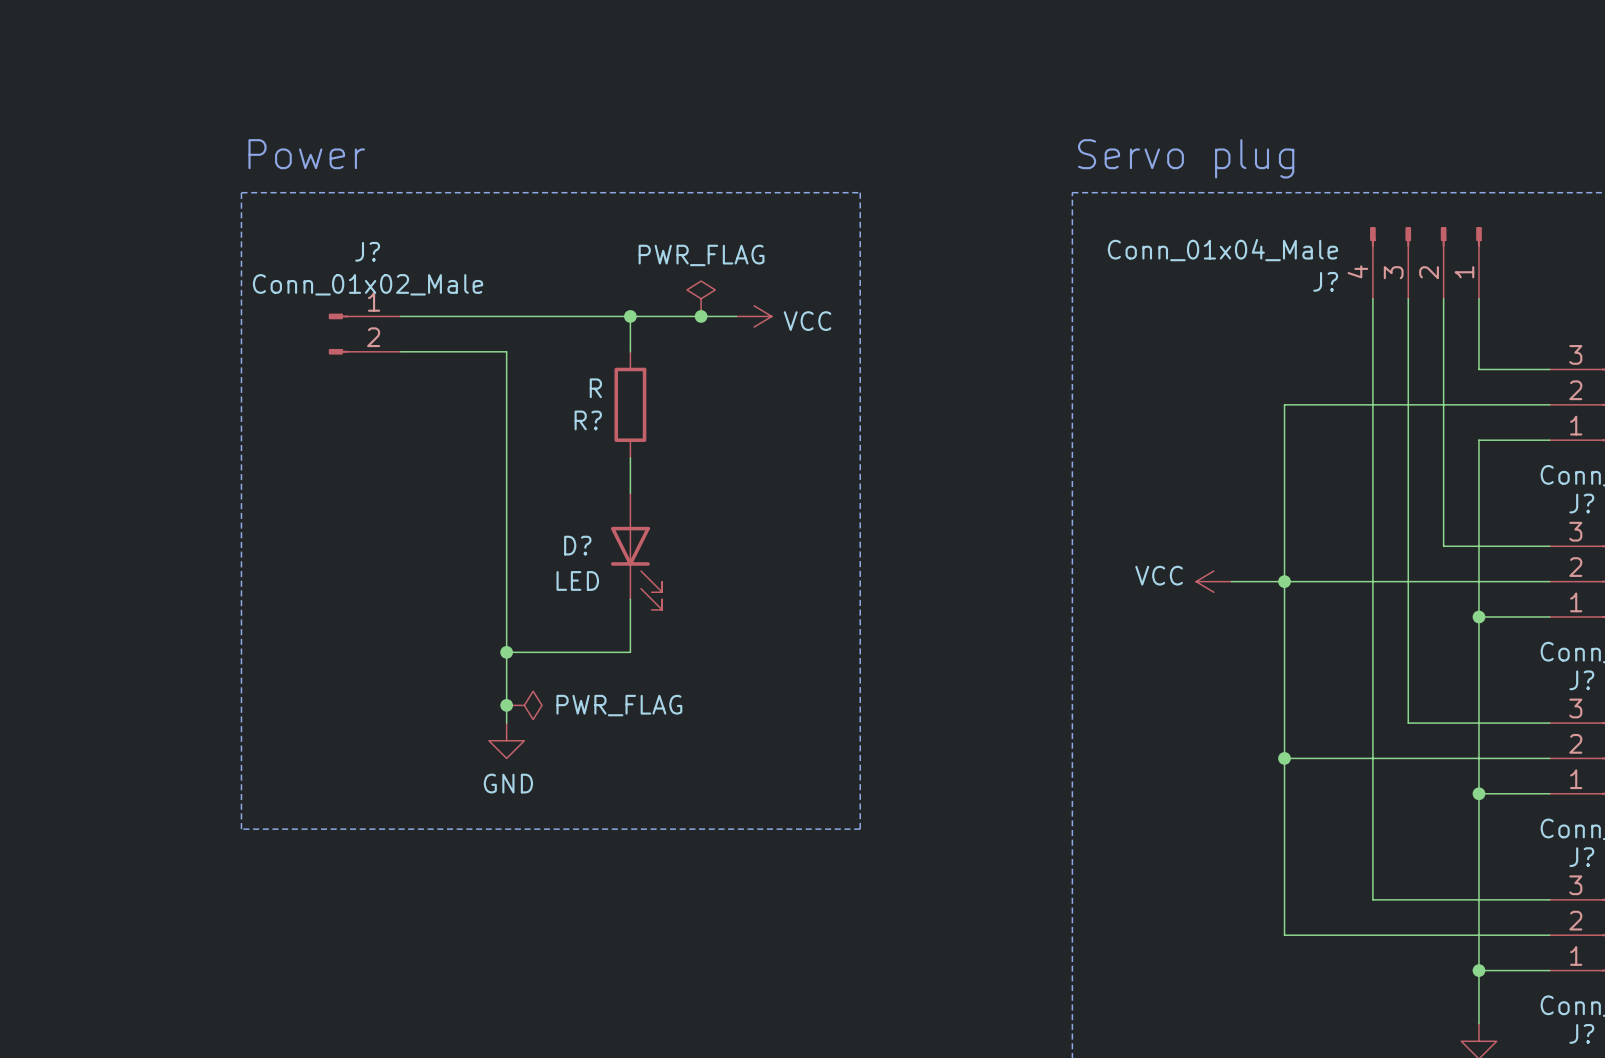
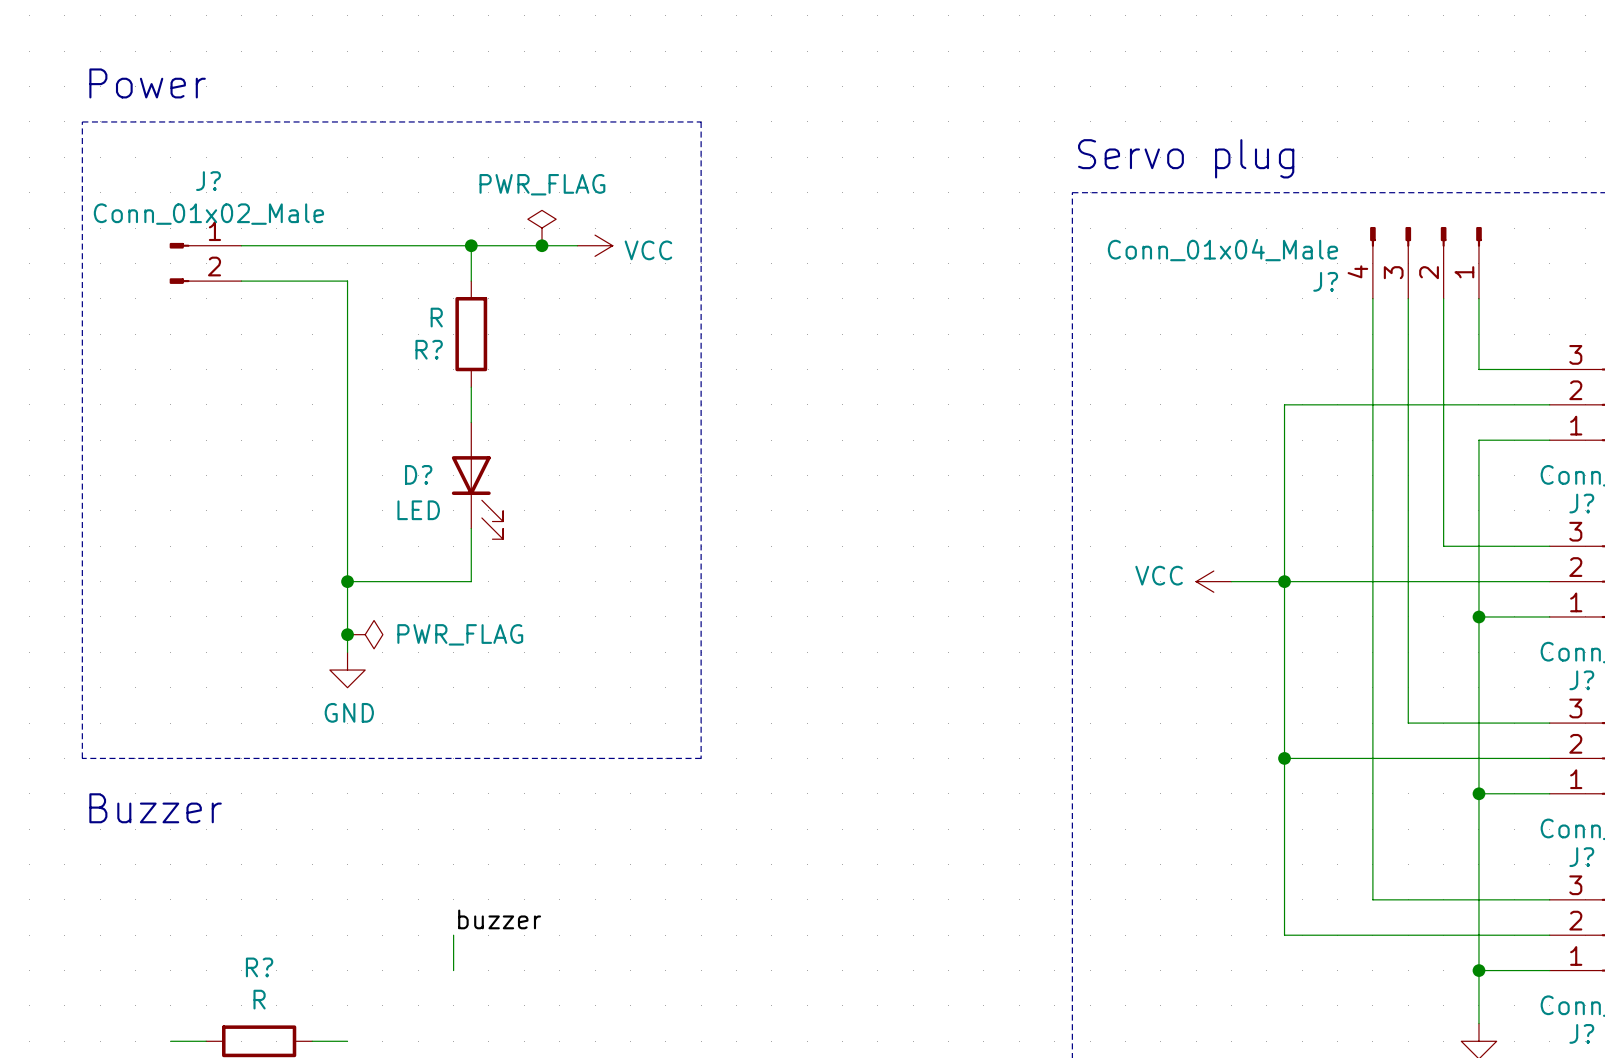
text position: Power (306, 154) -> Power (147, 83)
line: (241, 192) (860, 192) (860, 829) (241, 829) (241, 192) -> (82, 121) (701, 121) (701, 758) (82, 758) (82, 121)
junction: none -> (471, 245)
junction: none -> (542, 245)
power symbol position: PWR_FLAG (701, 298) -> PWR_FLAG (542, 228)
wire: (400, 316) (736, 316) -> (241, 245) (577, 245)
wire: (630, 316) (630, 351) -> (471, 245) (471, 281)
junction: (630, 316) -> none
junction: (701, 316) -> none
power symbol position: VCC (754, 316) -> VCC (595, 245)
J? position: (364, 334) -> (205, 263)
wire: (400, 351) (506, 351) (506, 723) -> (241, 281) (347, 281) (347, 652)
R? position: (630, 404) -> (471, 334)
wire: (630, 457) (630, 493) -> (471, 387) (471, 422)
D? position: (636, 551) -> (477, 480)
junction: none -> (347, 581)
wire: (630, 599) (630, 652) (506, 652) -> (471, 528) (471, 581) (347, 581)
junction: none -> (347, 634)
junction: (506, 652) -> none
junction: (506, 705) -> none
power symbol position: PWR_FLAG (524, 705) -> PWR_FLAG (365, 634)
power symbol position: GND (506, 740) -> GND (347, 670)
text: none -> Buzzer (155, 808)
label: none -> buzzer (499, 919)
wire: none -> (453, 935) (453, 970)
wire: none -> (170, 1041) (206, 1041)
R?: none -> R (259, 1041)
wire: none -> (312, 1041) (347, 1041)

